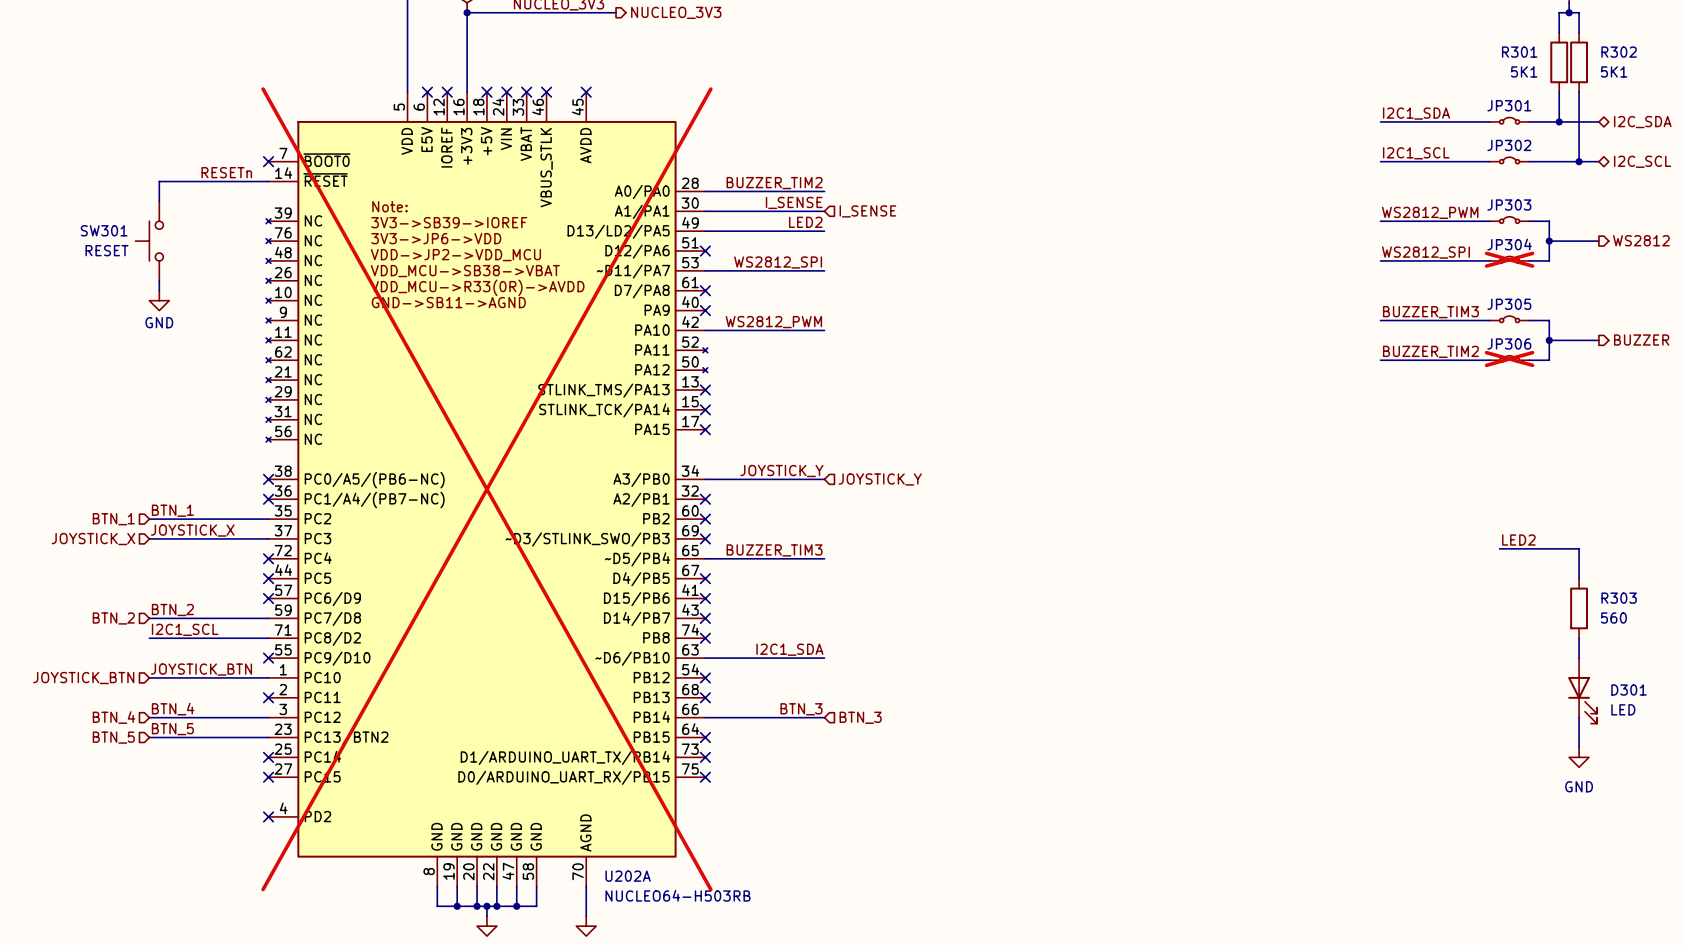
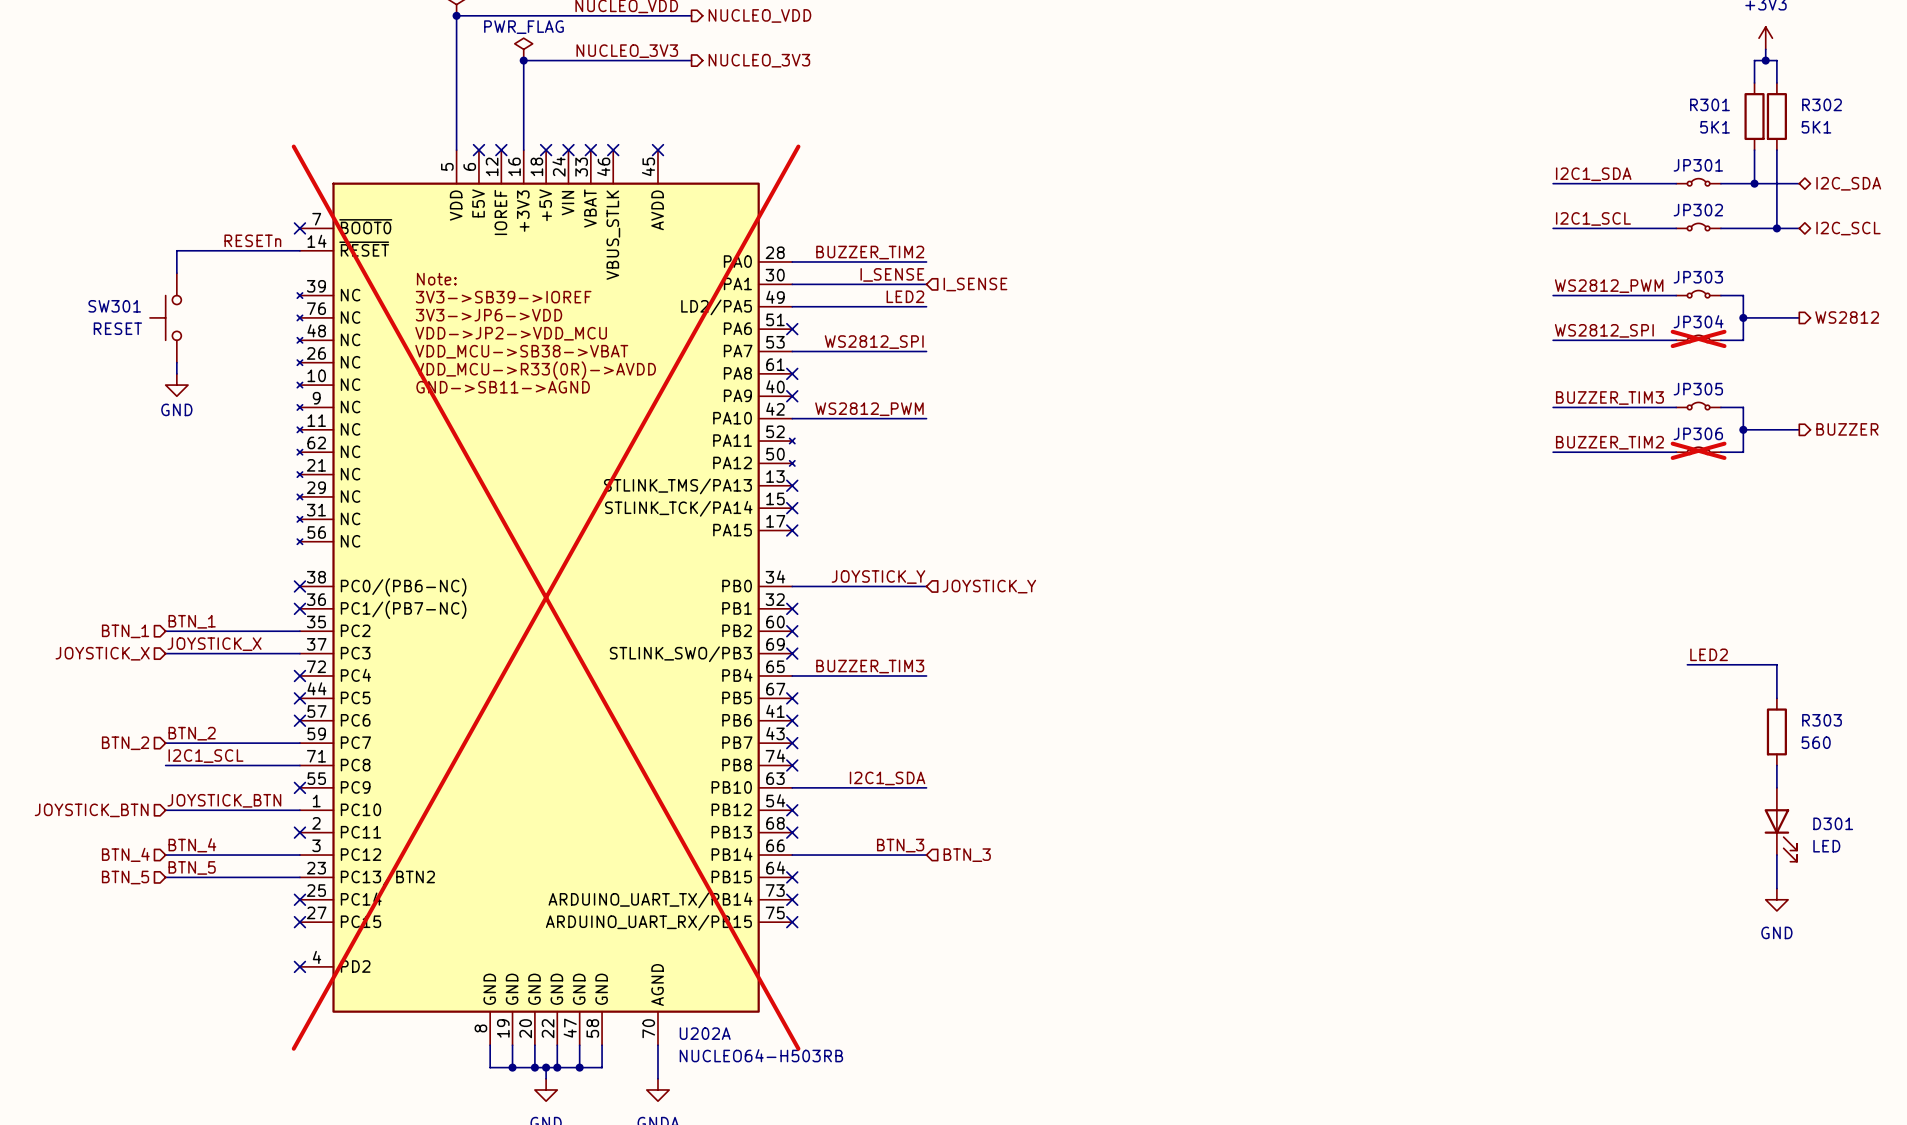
U202A symbol: [266, 92, 708, 887] -> [297, 150, 795, 1046]

